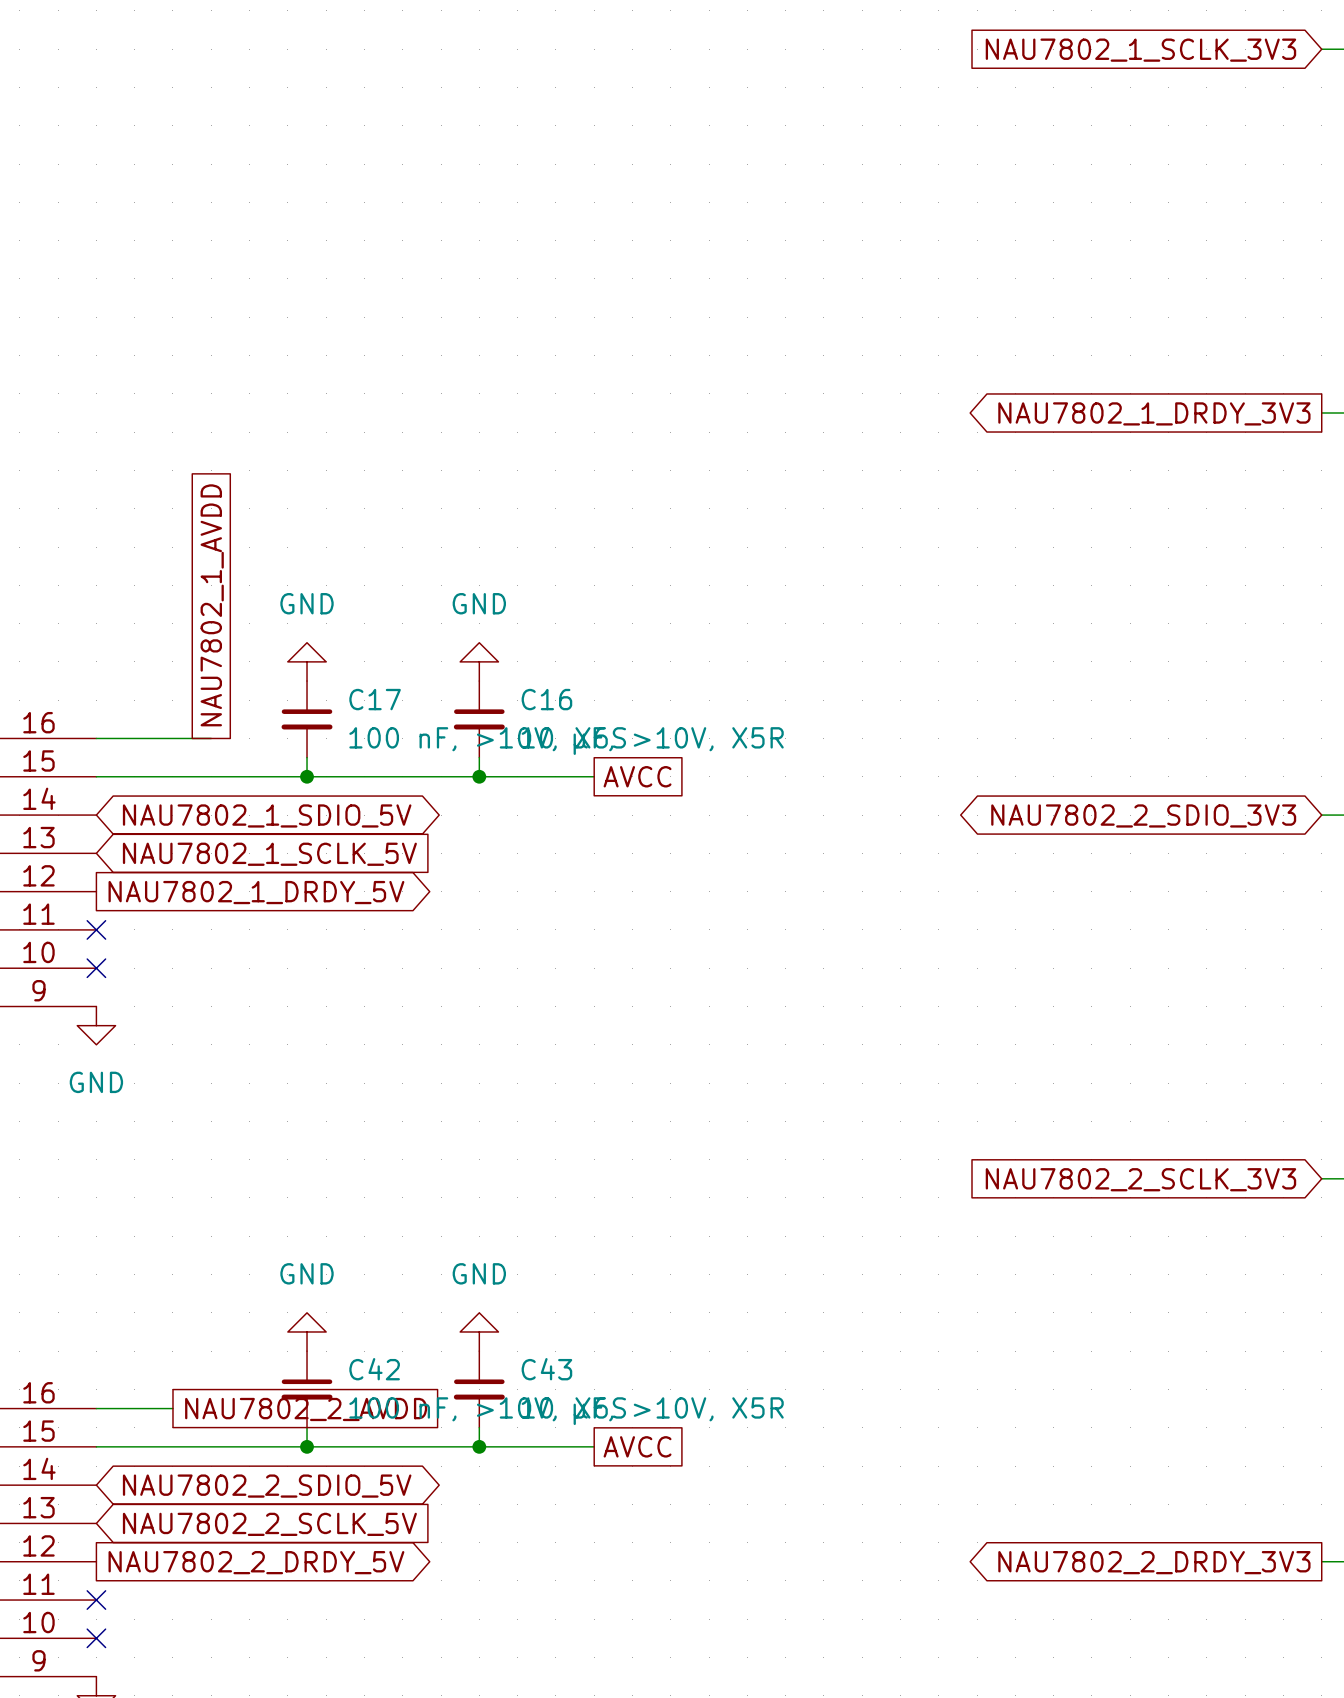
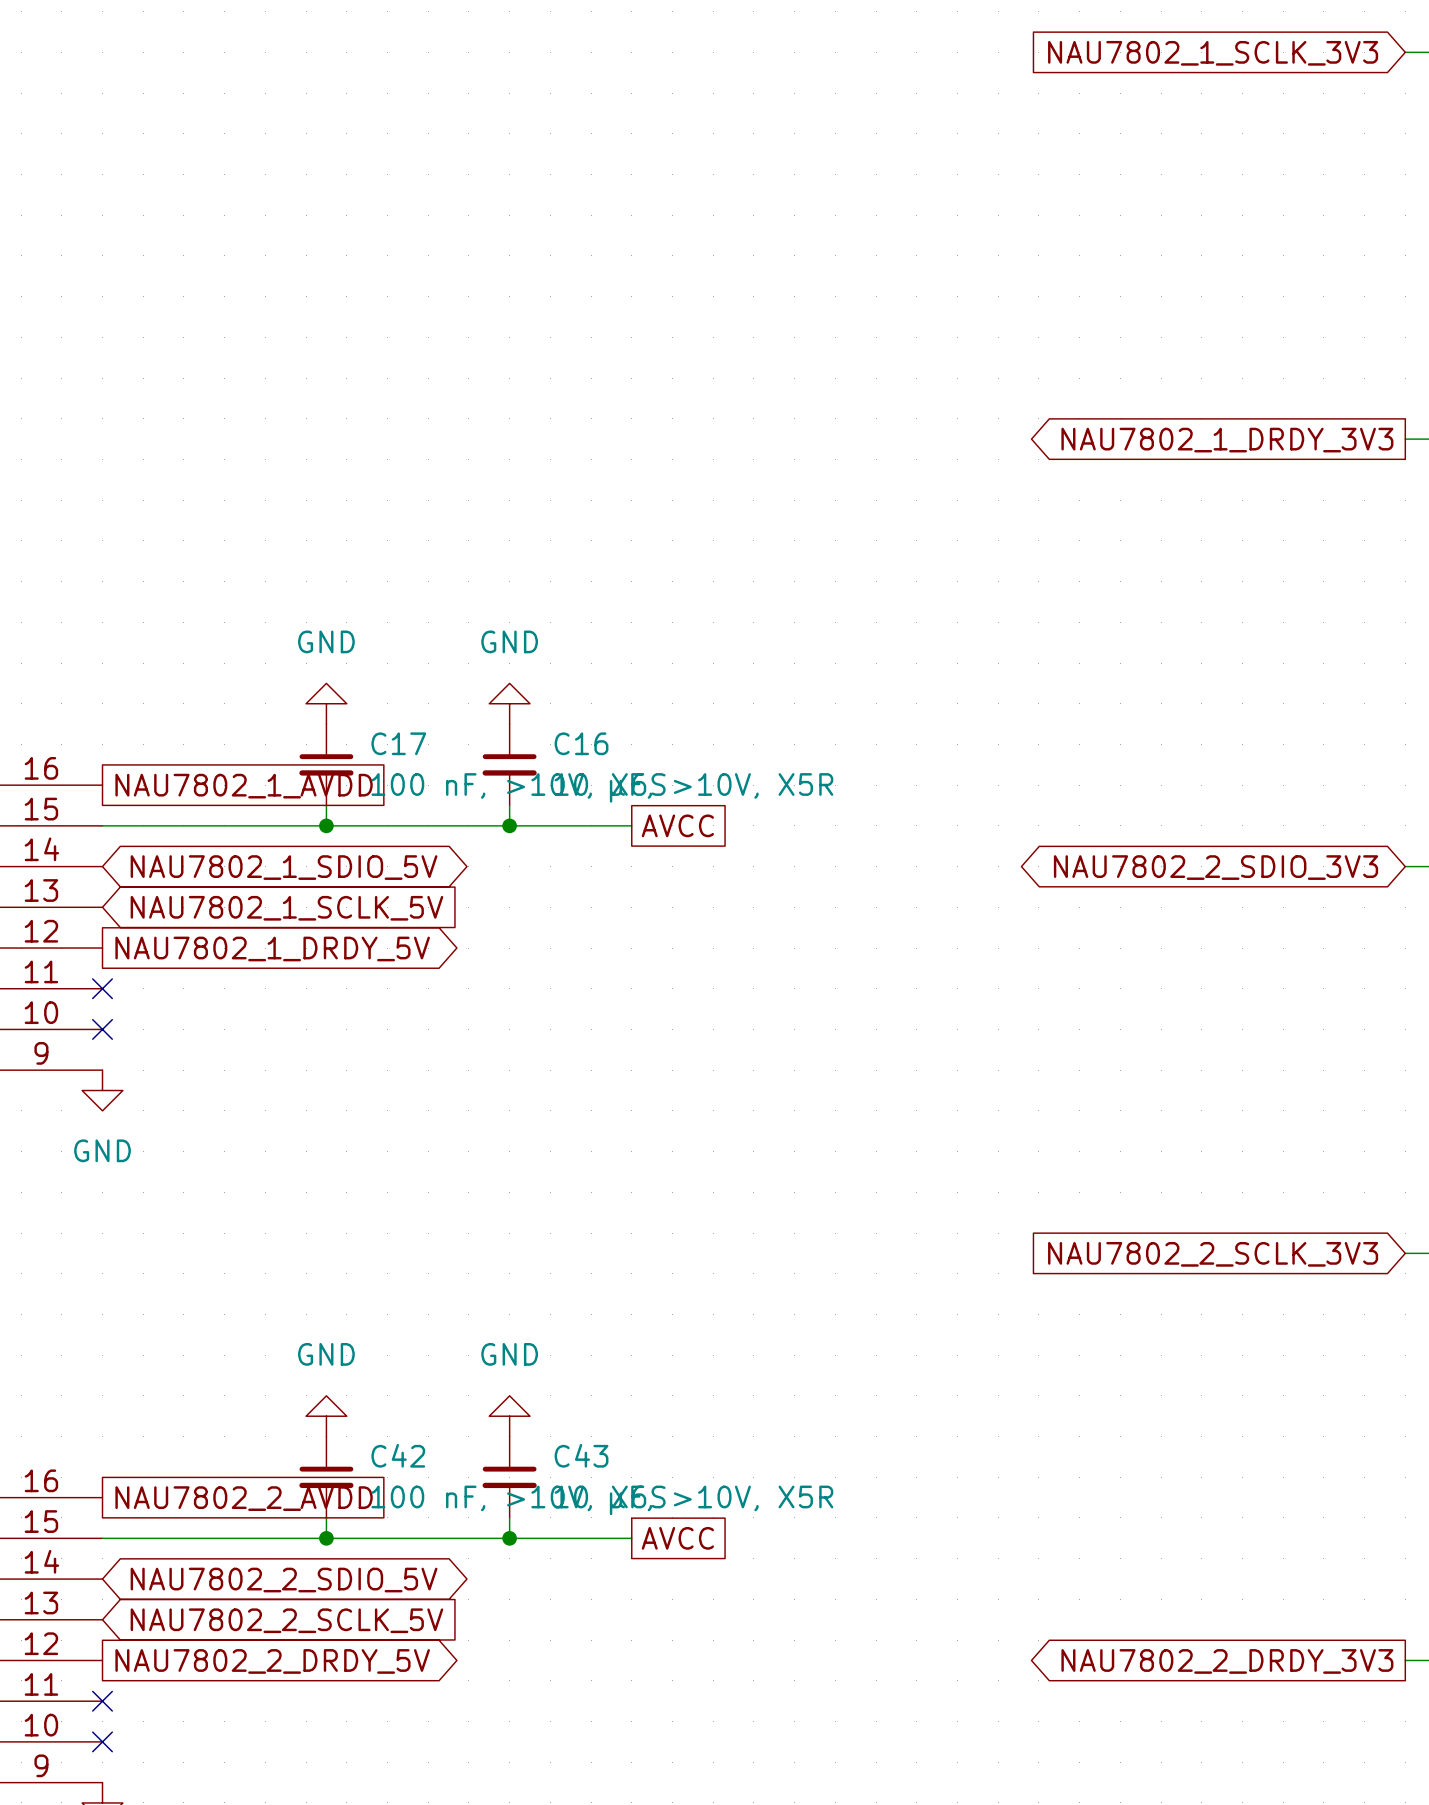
global label rotation: 0° (212, 605) -> 90° clockwise (244, 786)
wire: (96, 738) (211, 738) -> none
wire: (96, 1408) (172, 1408) -> none
global label position: NAU7802_2_AVDD (306, 1409) -> NAU7802_2_AVDD (244, 1498)

